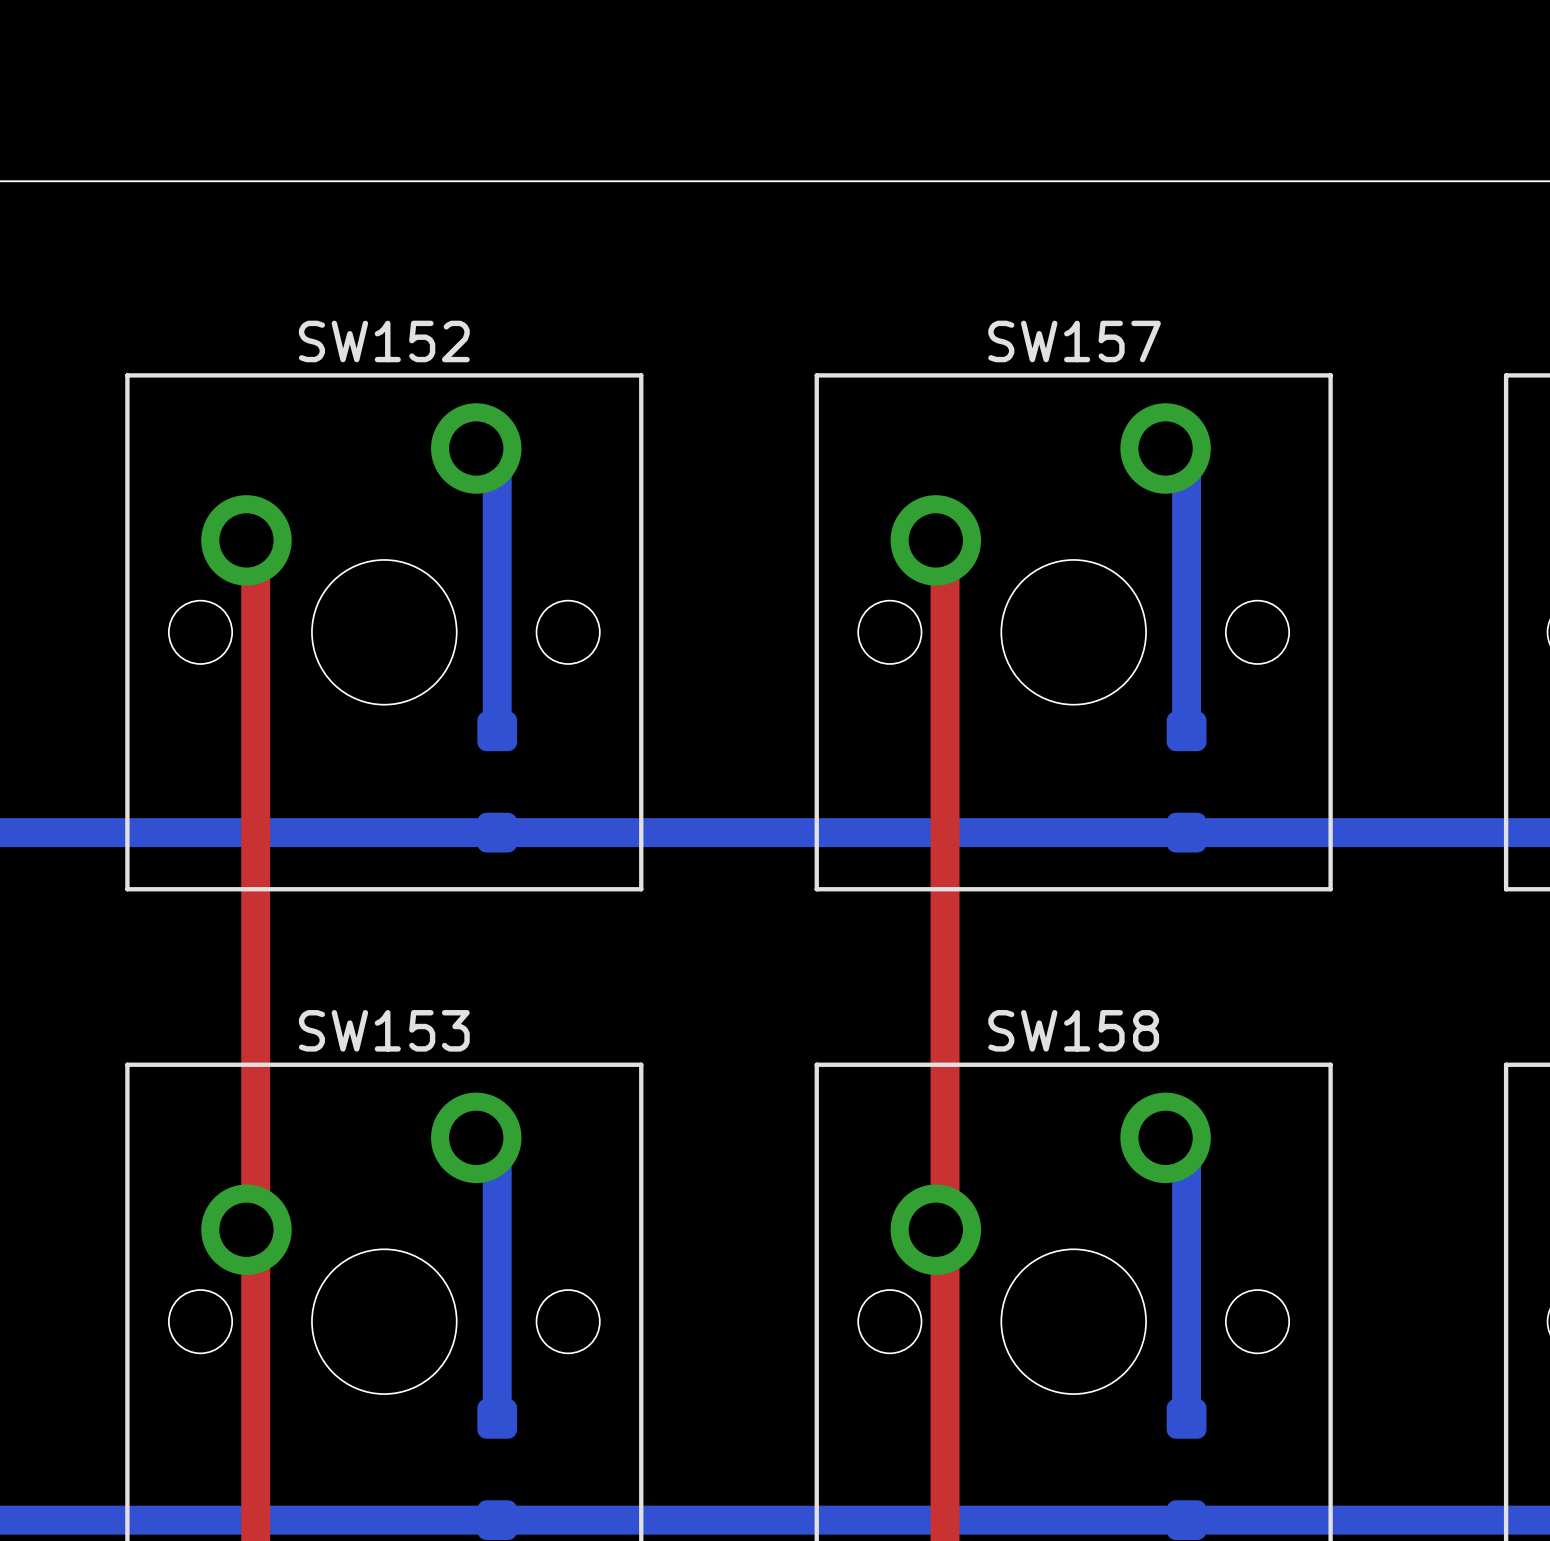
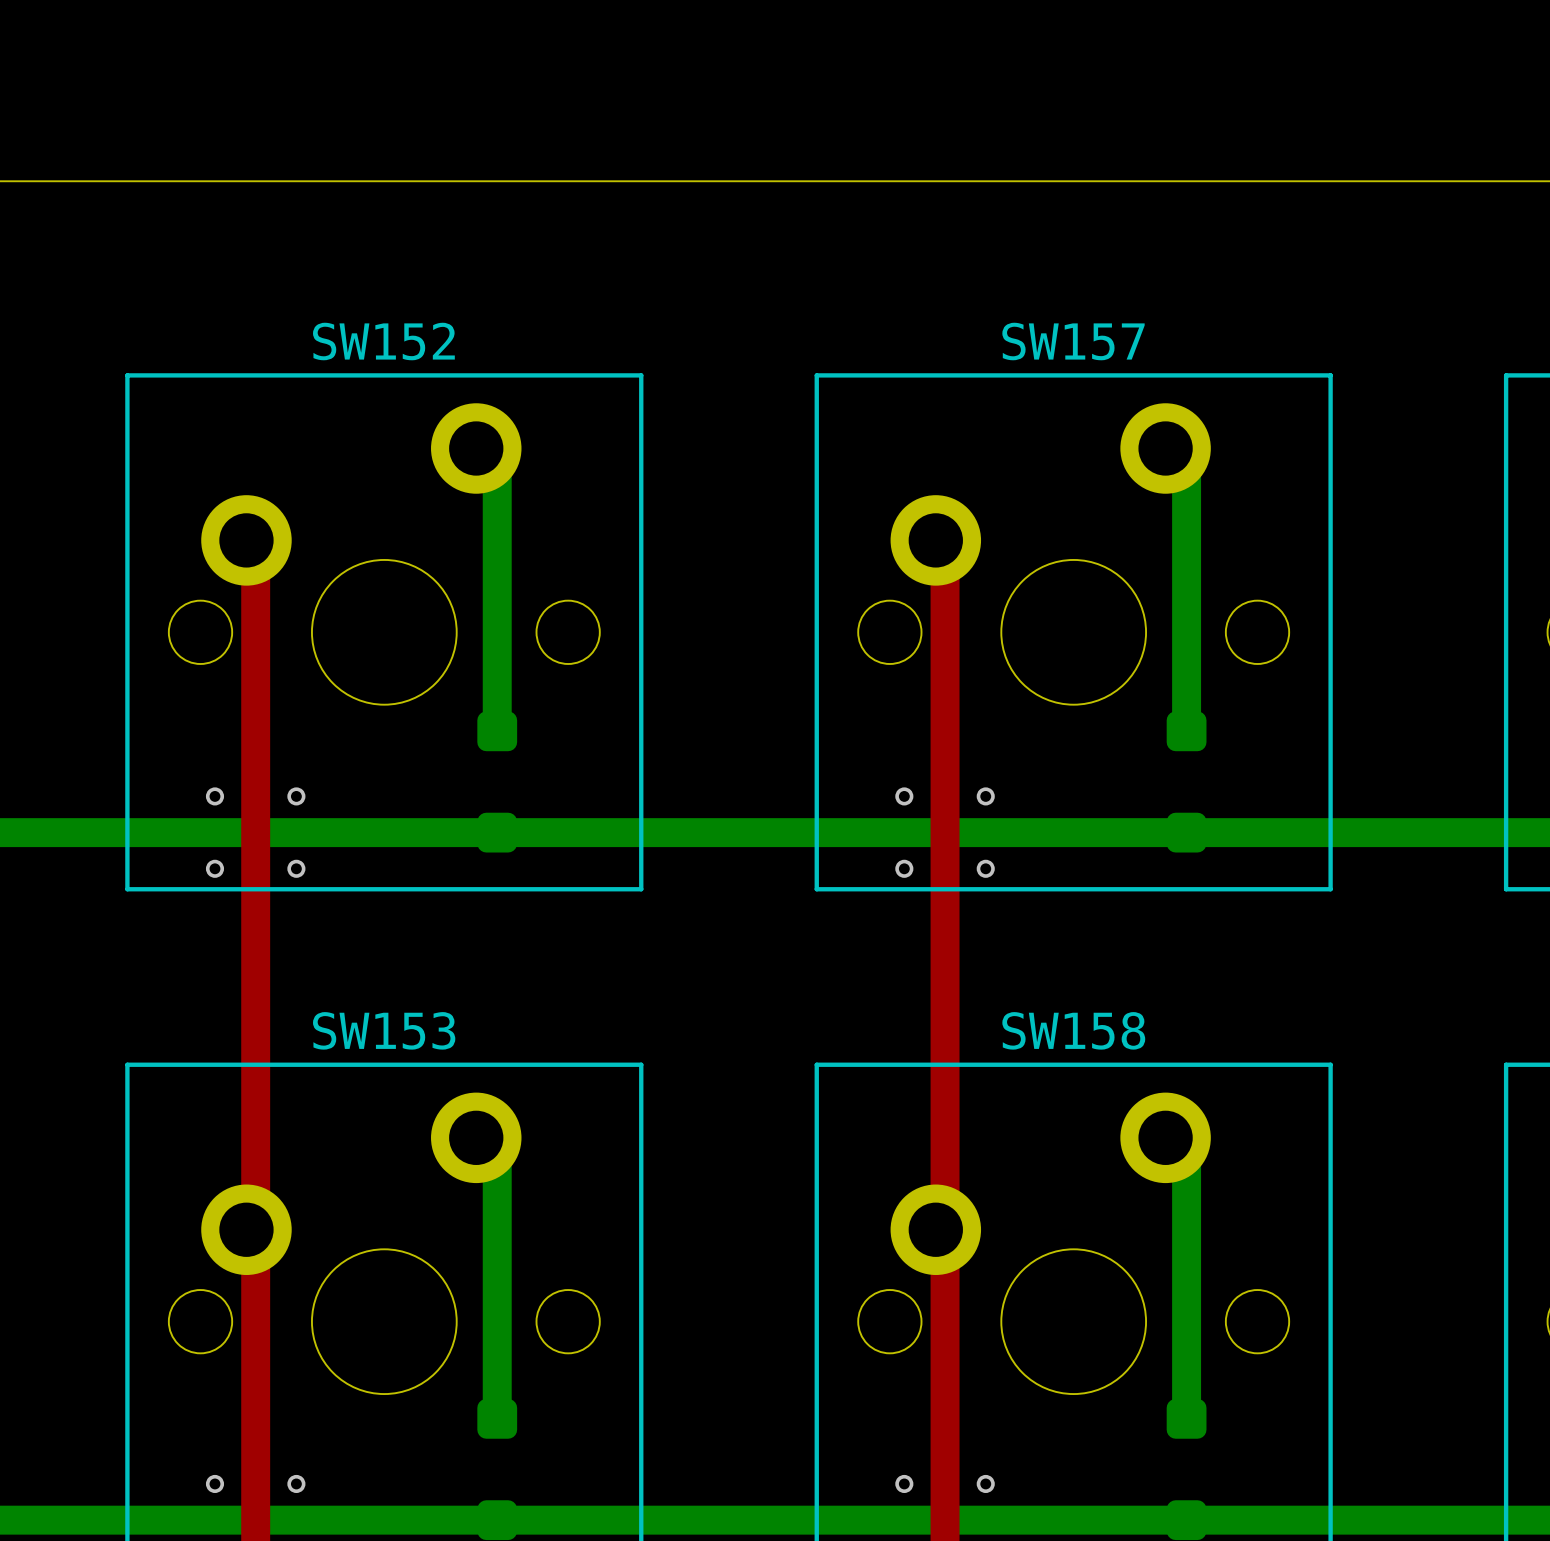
via: none -> (214, 796)
via: none -> (296, 796)
via: none -> (904, 796)
via: none -> (985, 796)
via: none -> (214, 868)
via: none -> (296, 868)
via: none -> (904, 868)
via: none -> (985, 868)
via: none -> (214, 1483)
via: none -> (296, 1483)
via: none -> (904, 1483)
via: none -> (985, 1483)

